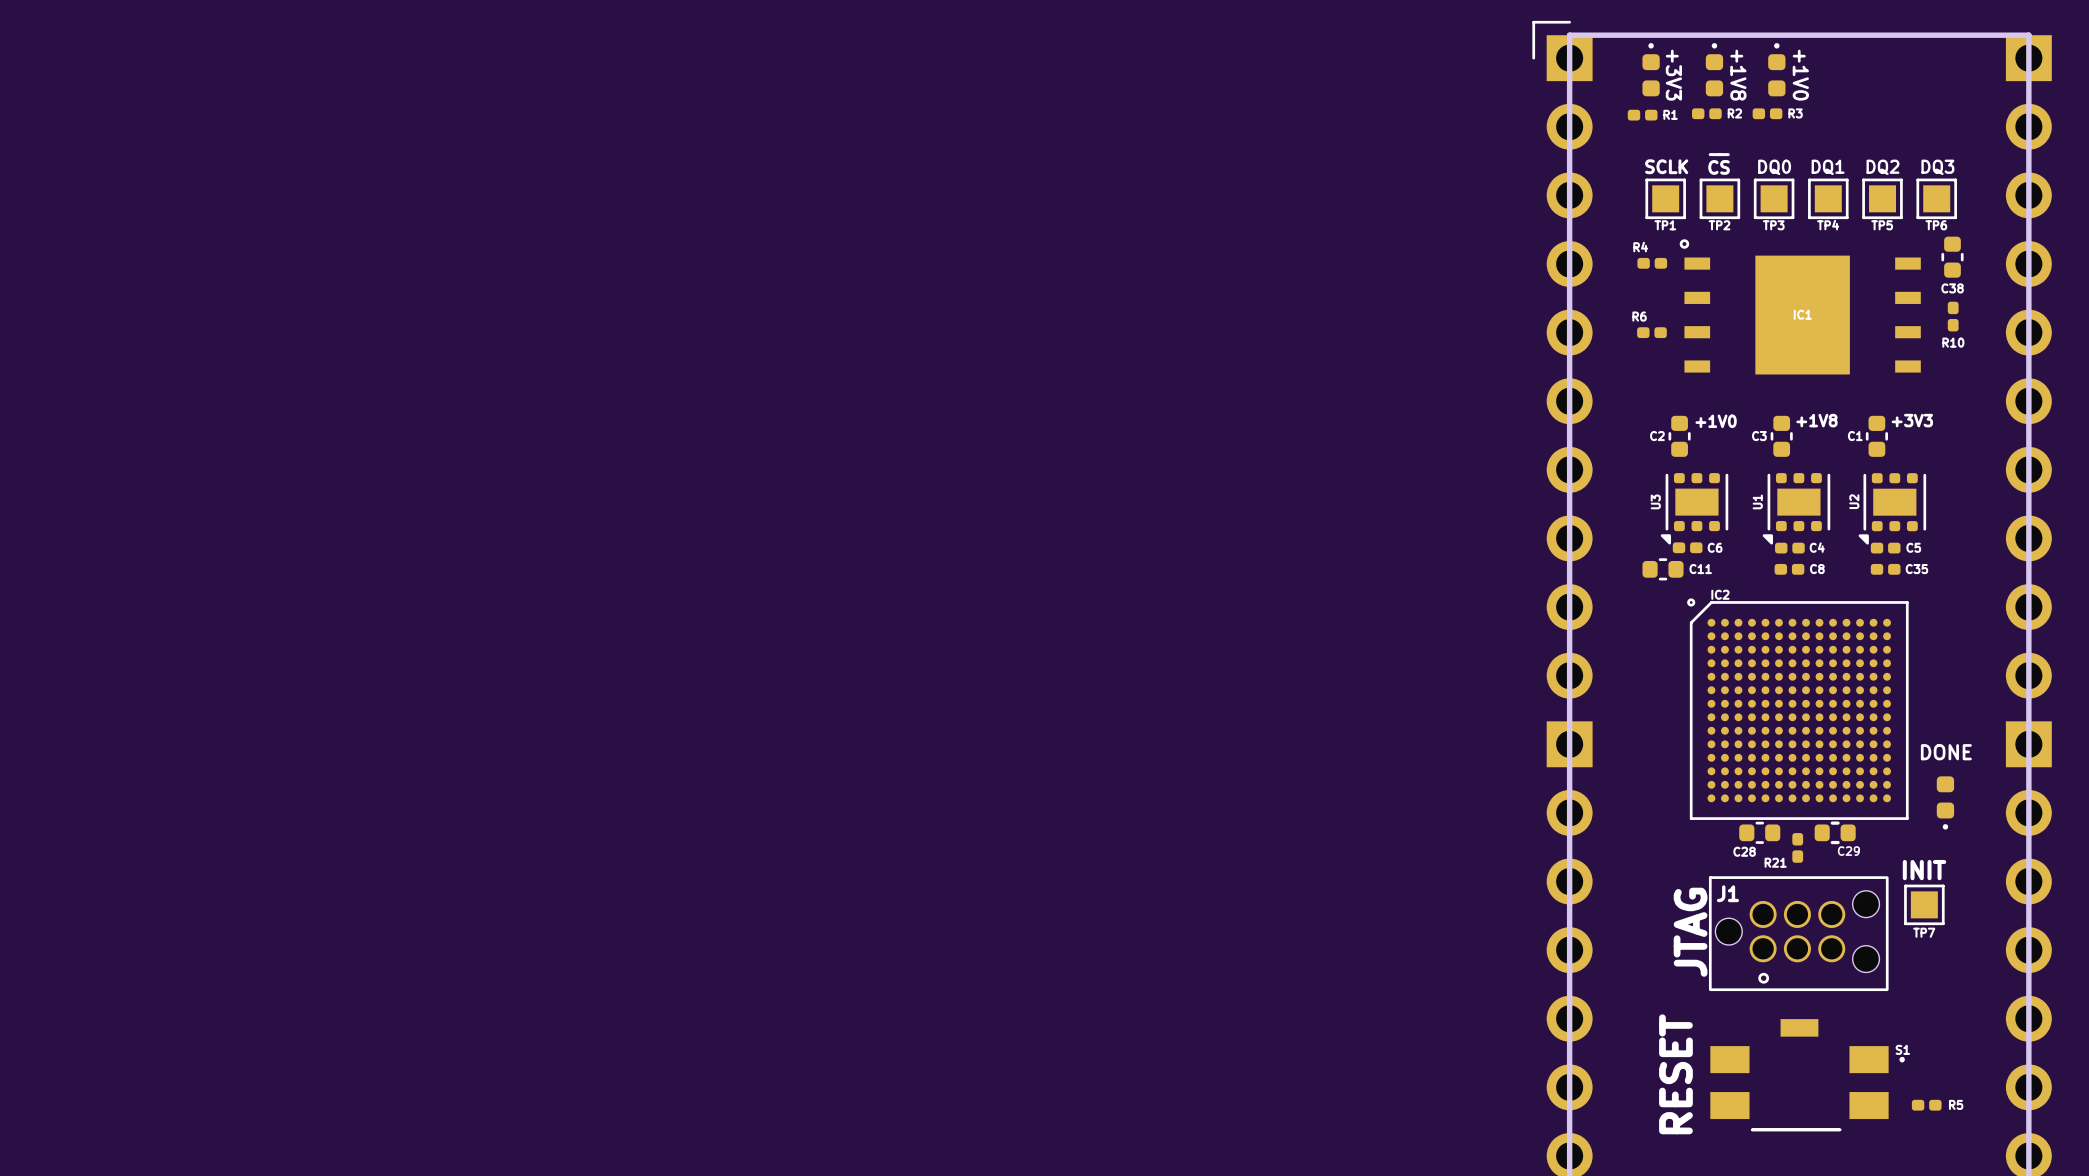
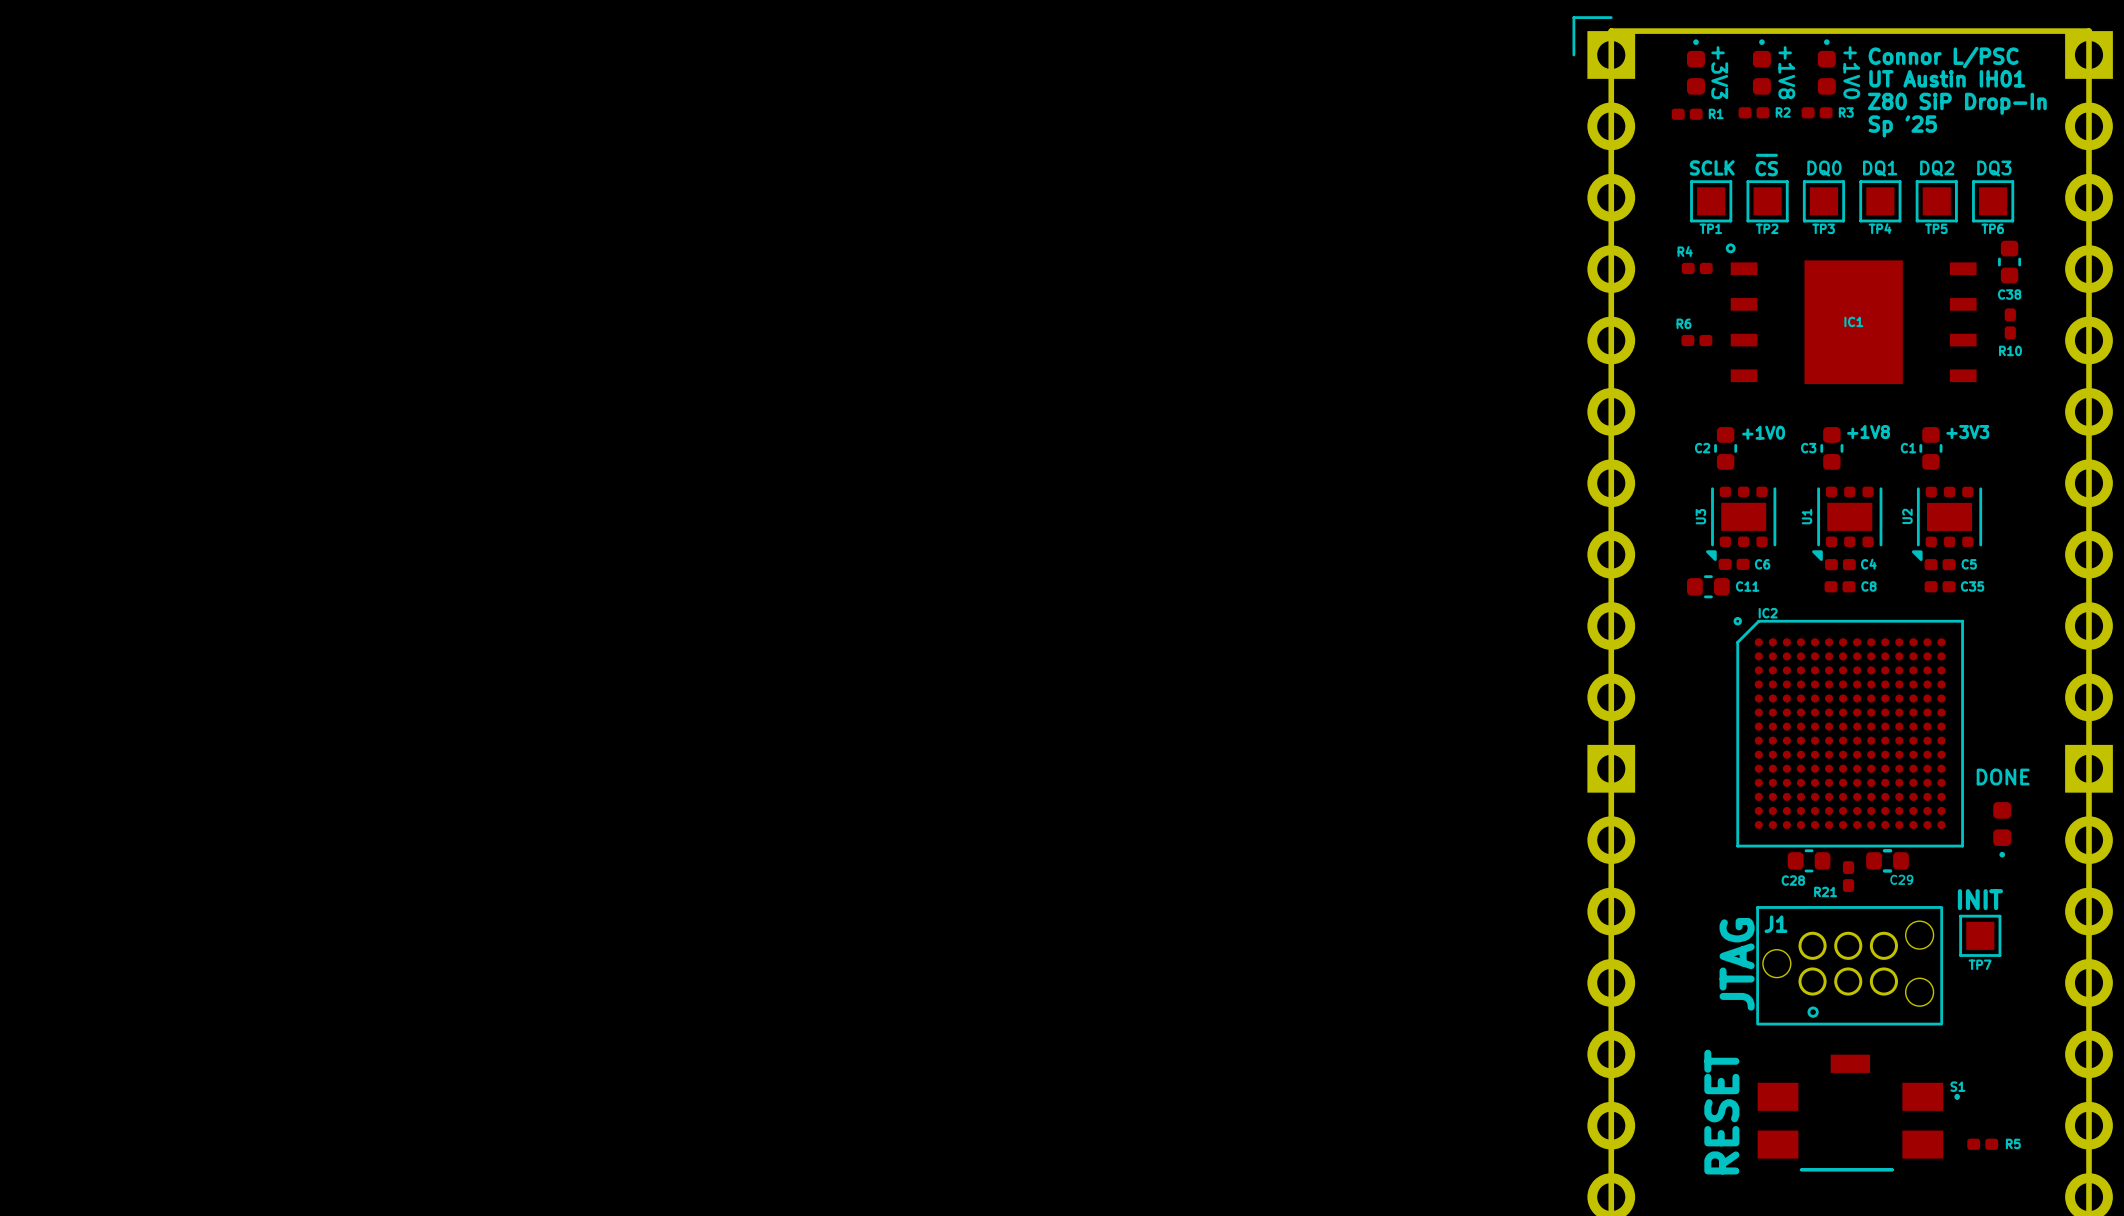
text: none -> Connor L/PSC (1943, 57)
text: none -> UT Austin IH01 (1947, 78)
text: none -> Z80 SiP Drop-In (1957, 103)
text: none -> Sp '25 (1902, 126)

